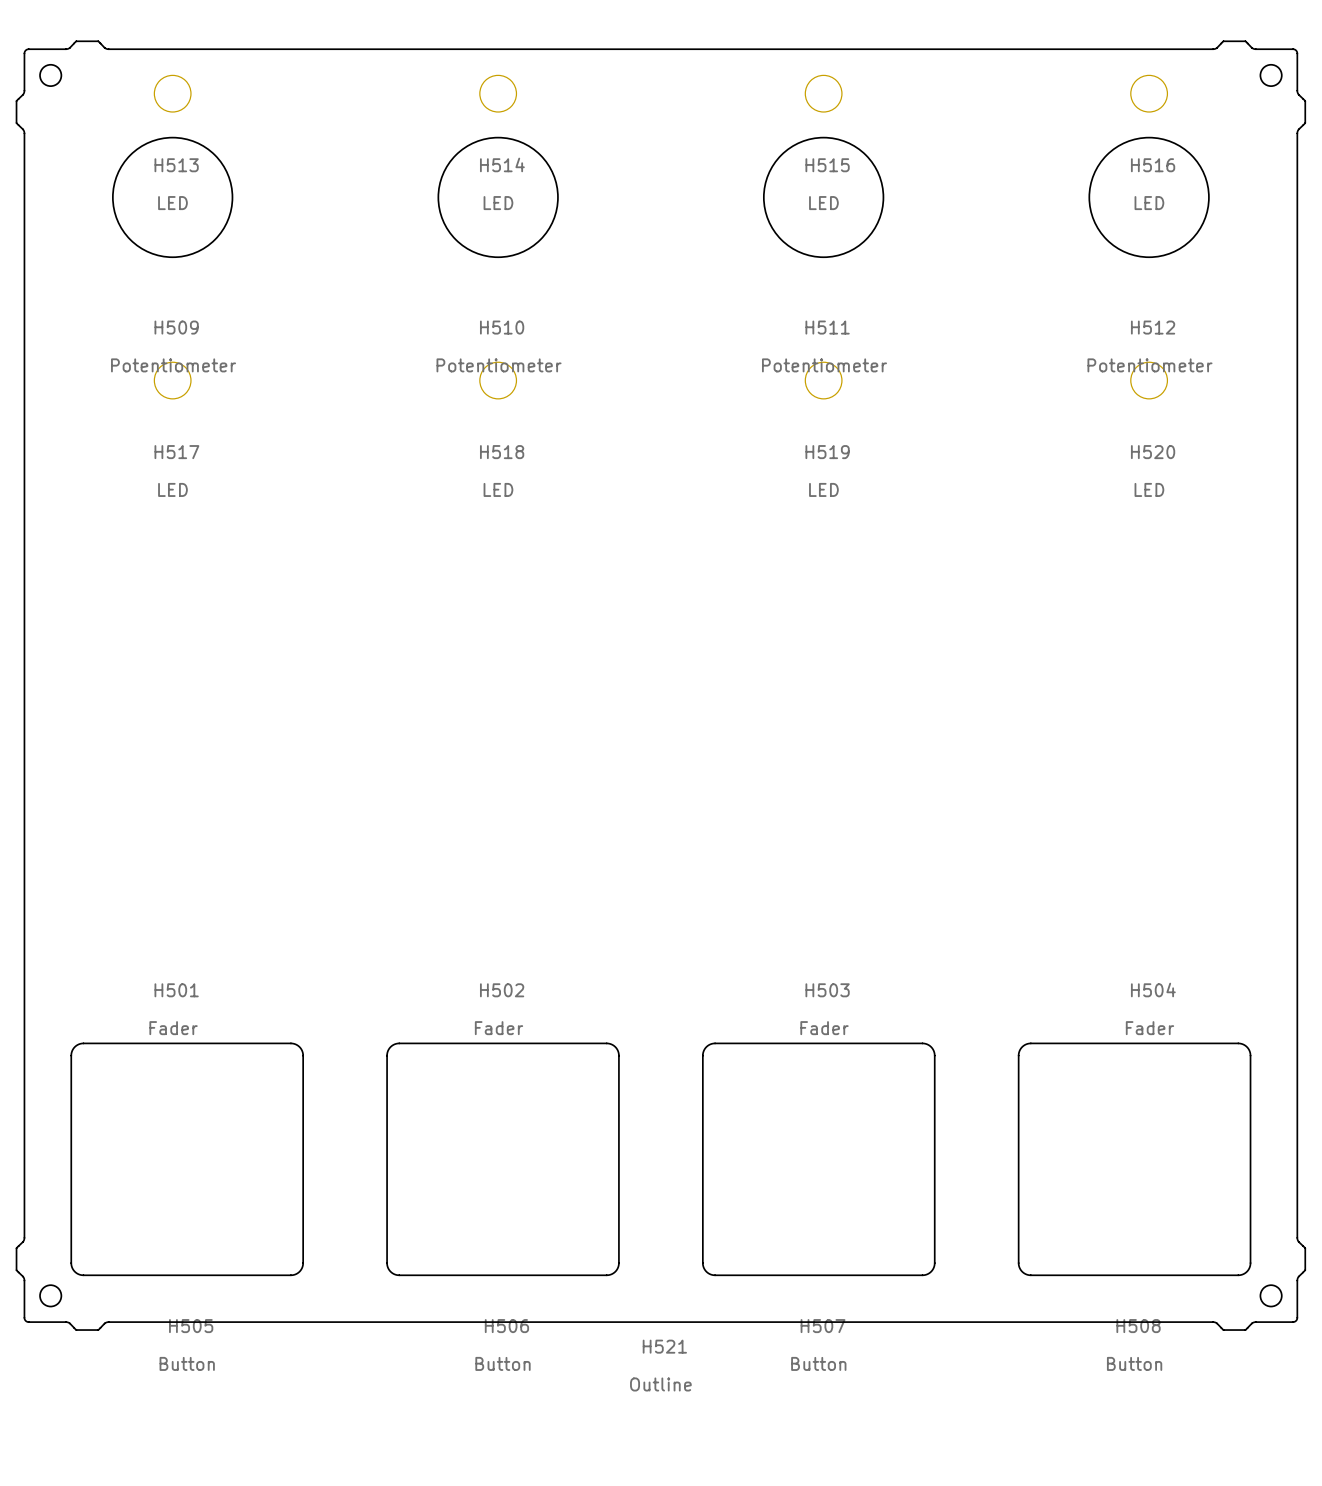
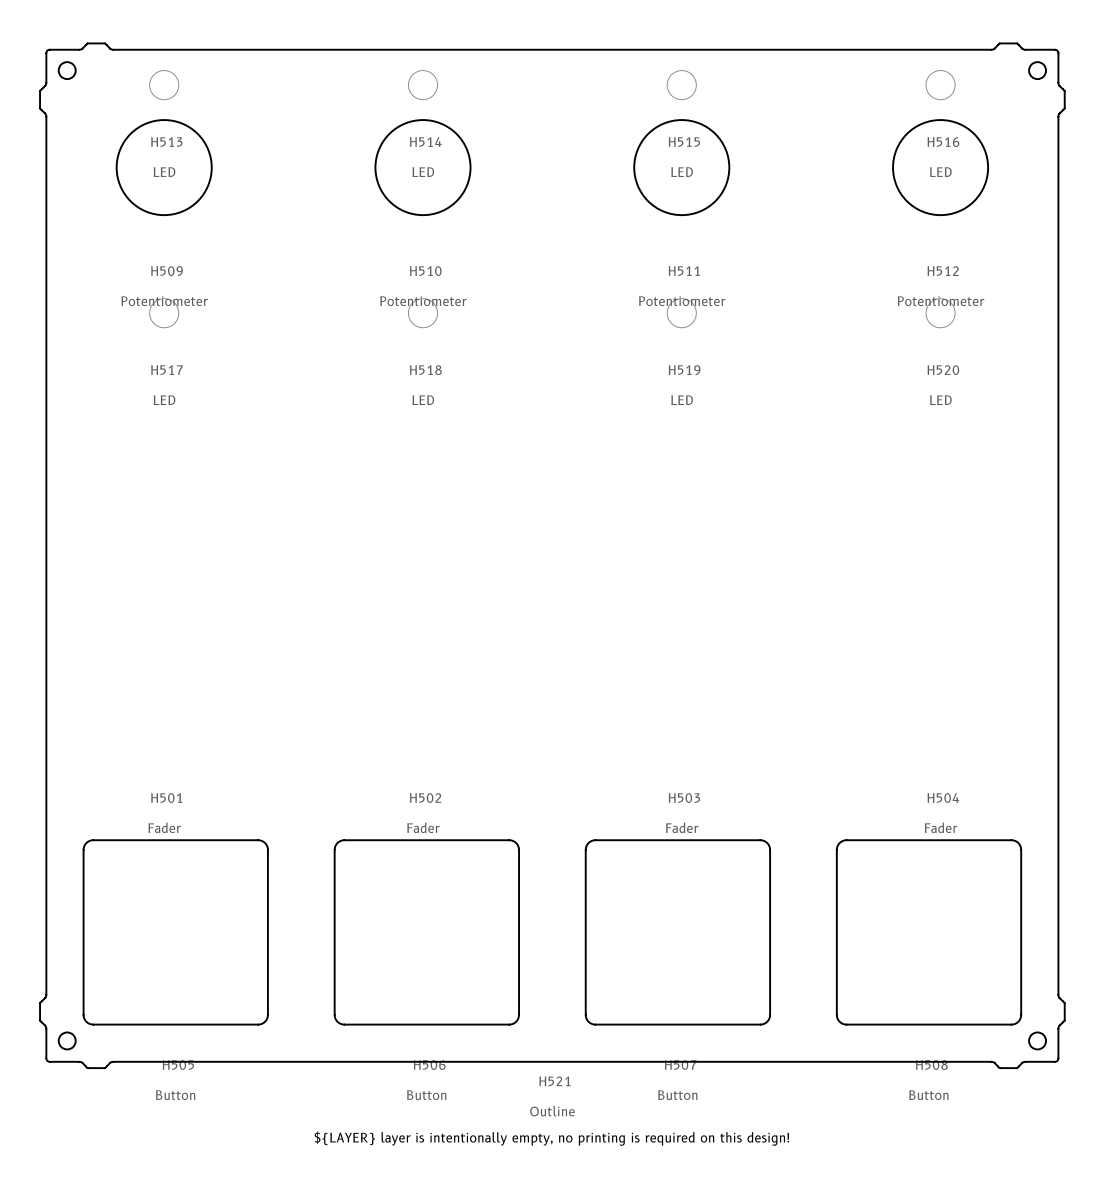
text: none -> ${LAYER} layer is intentionally empty, no printing is required on this design! (551, 1138)

